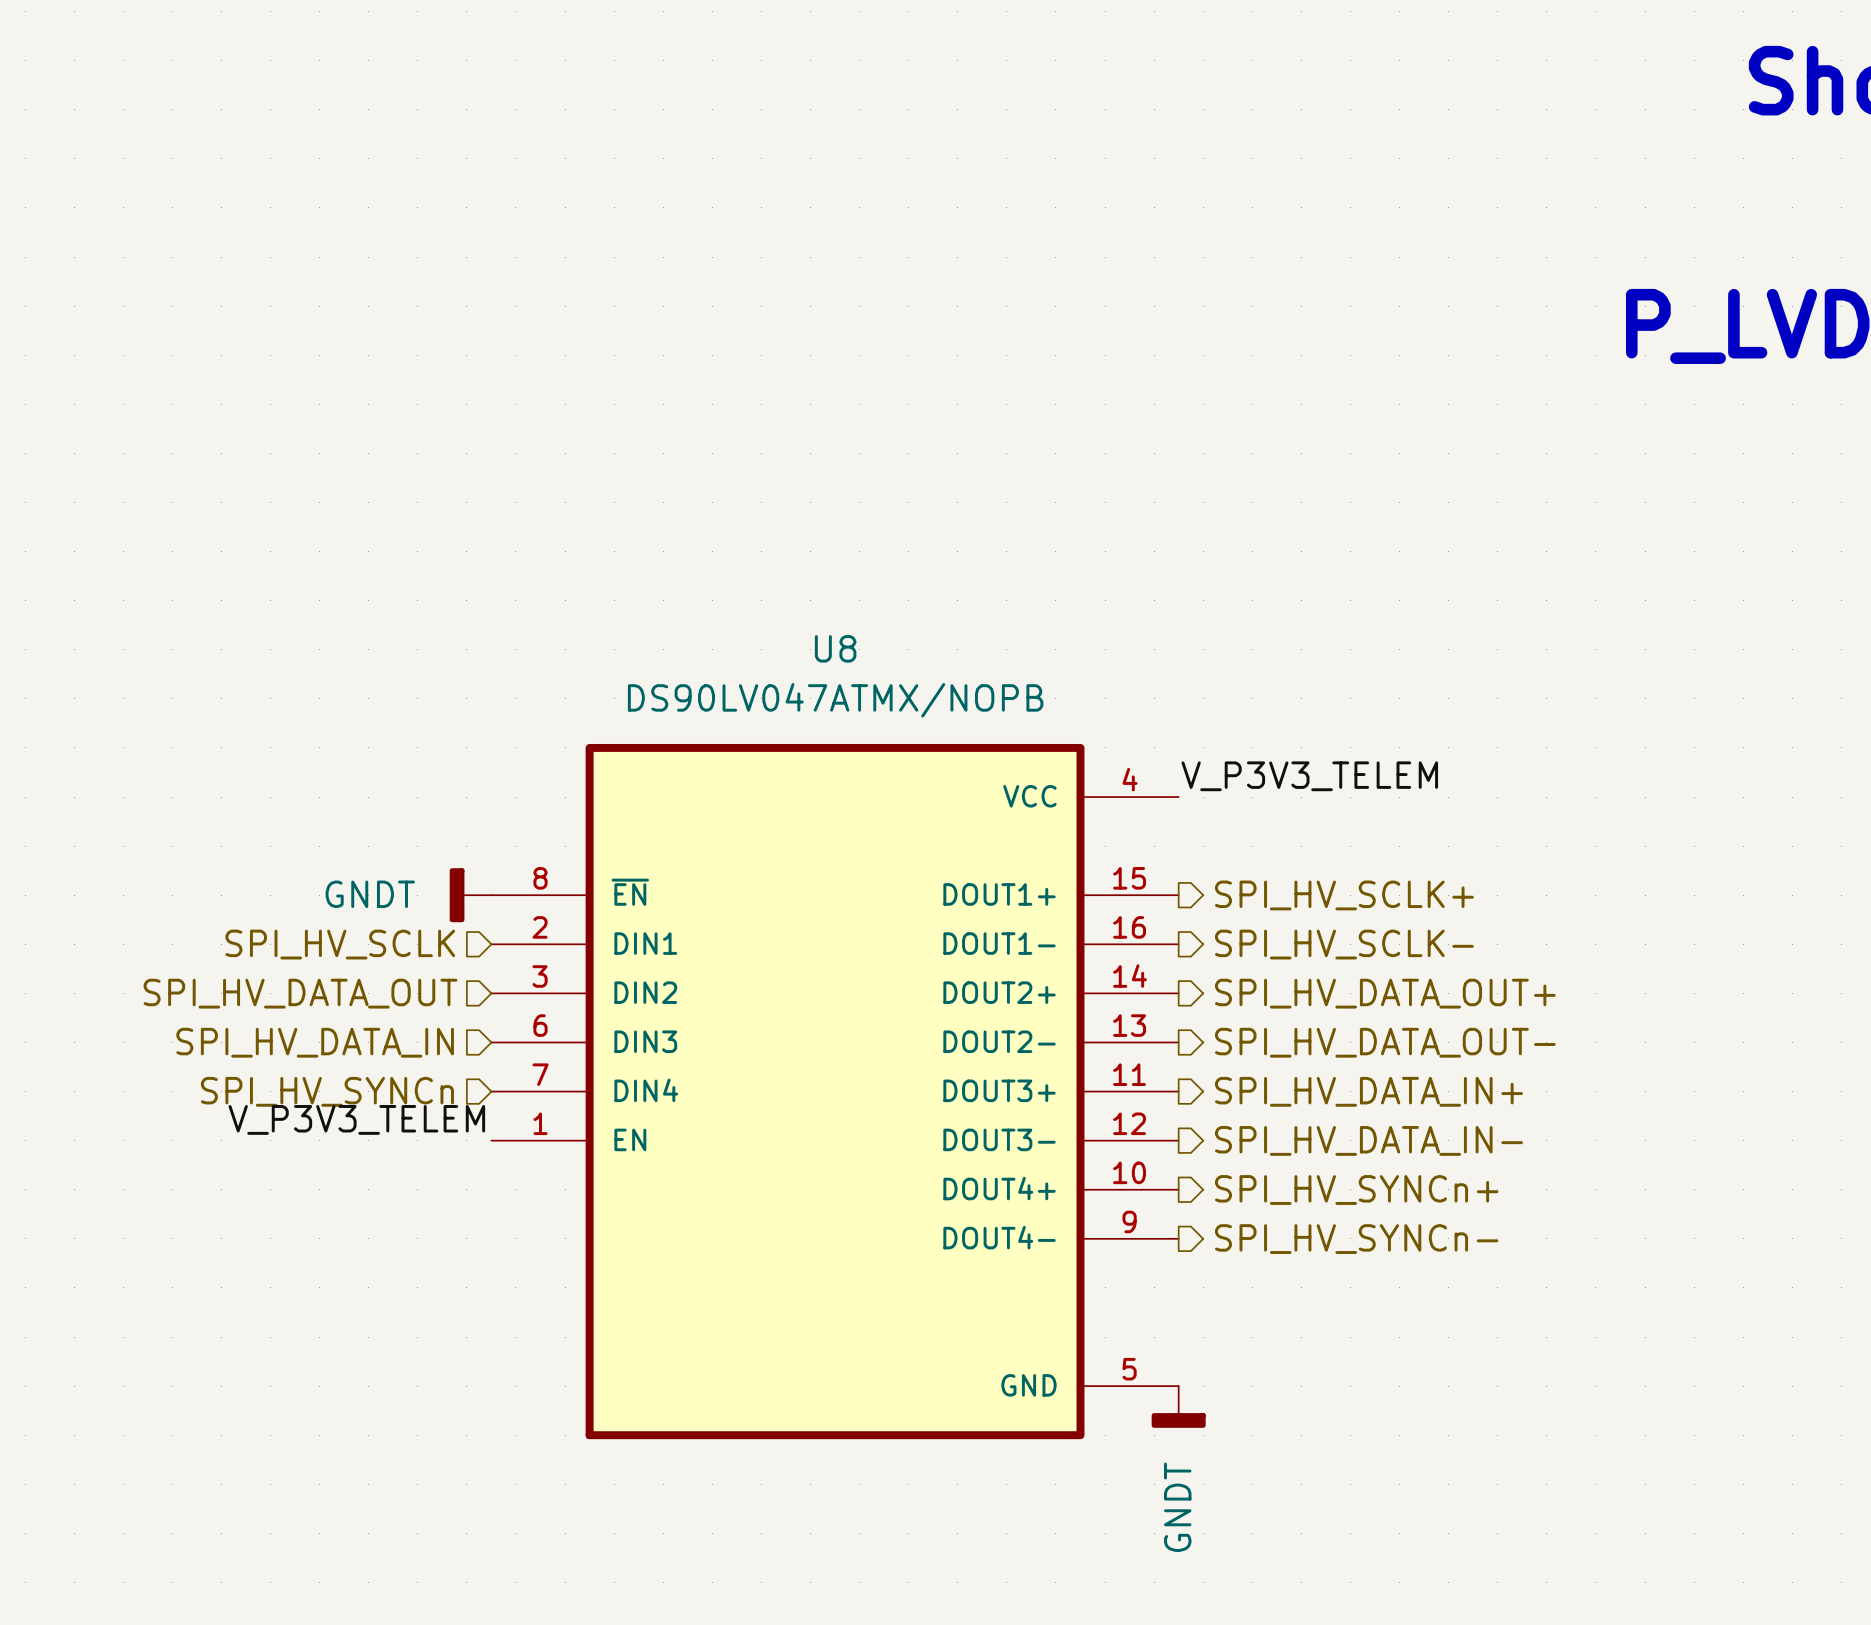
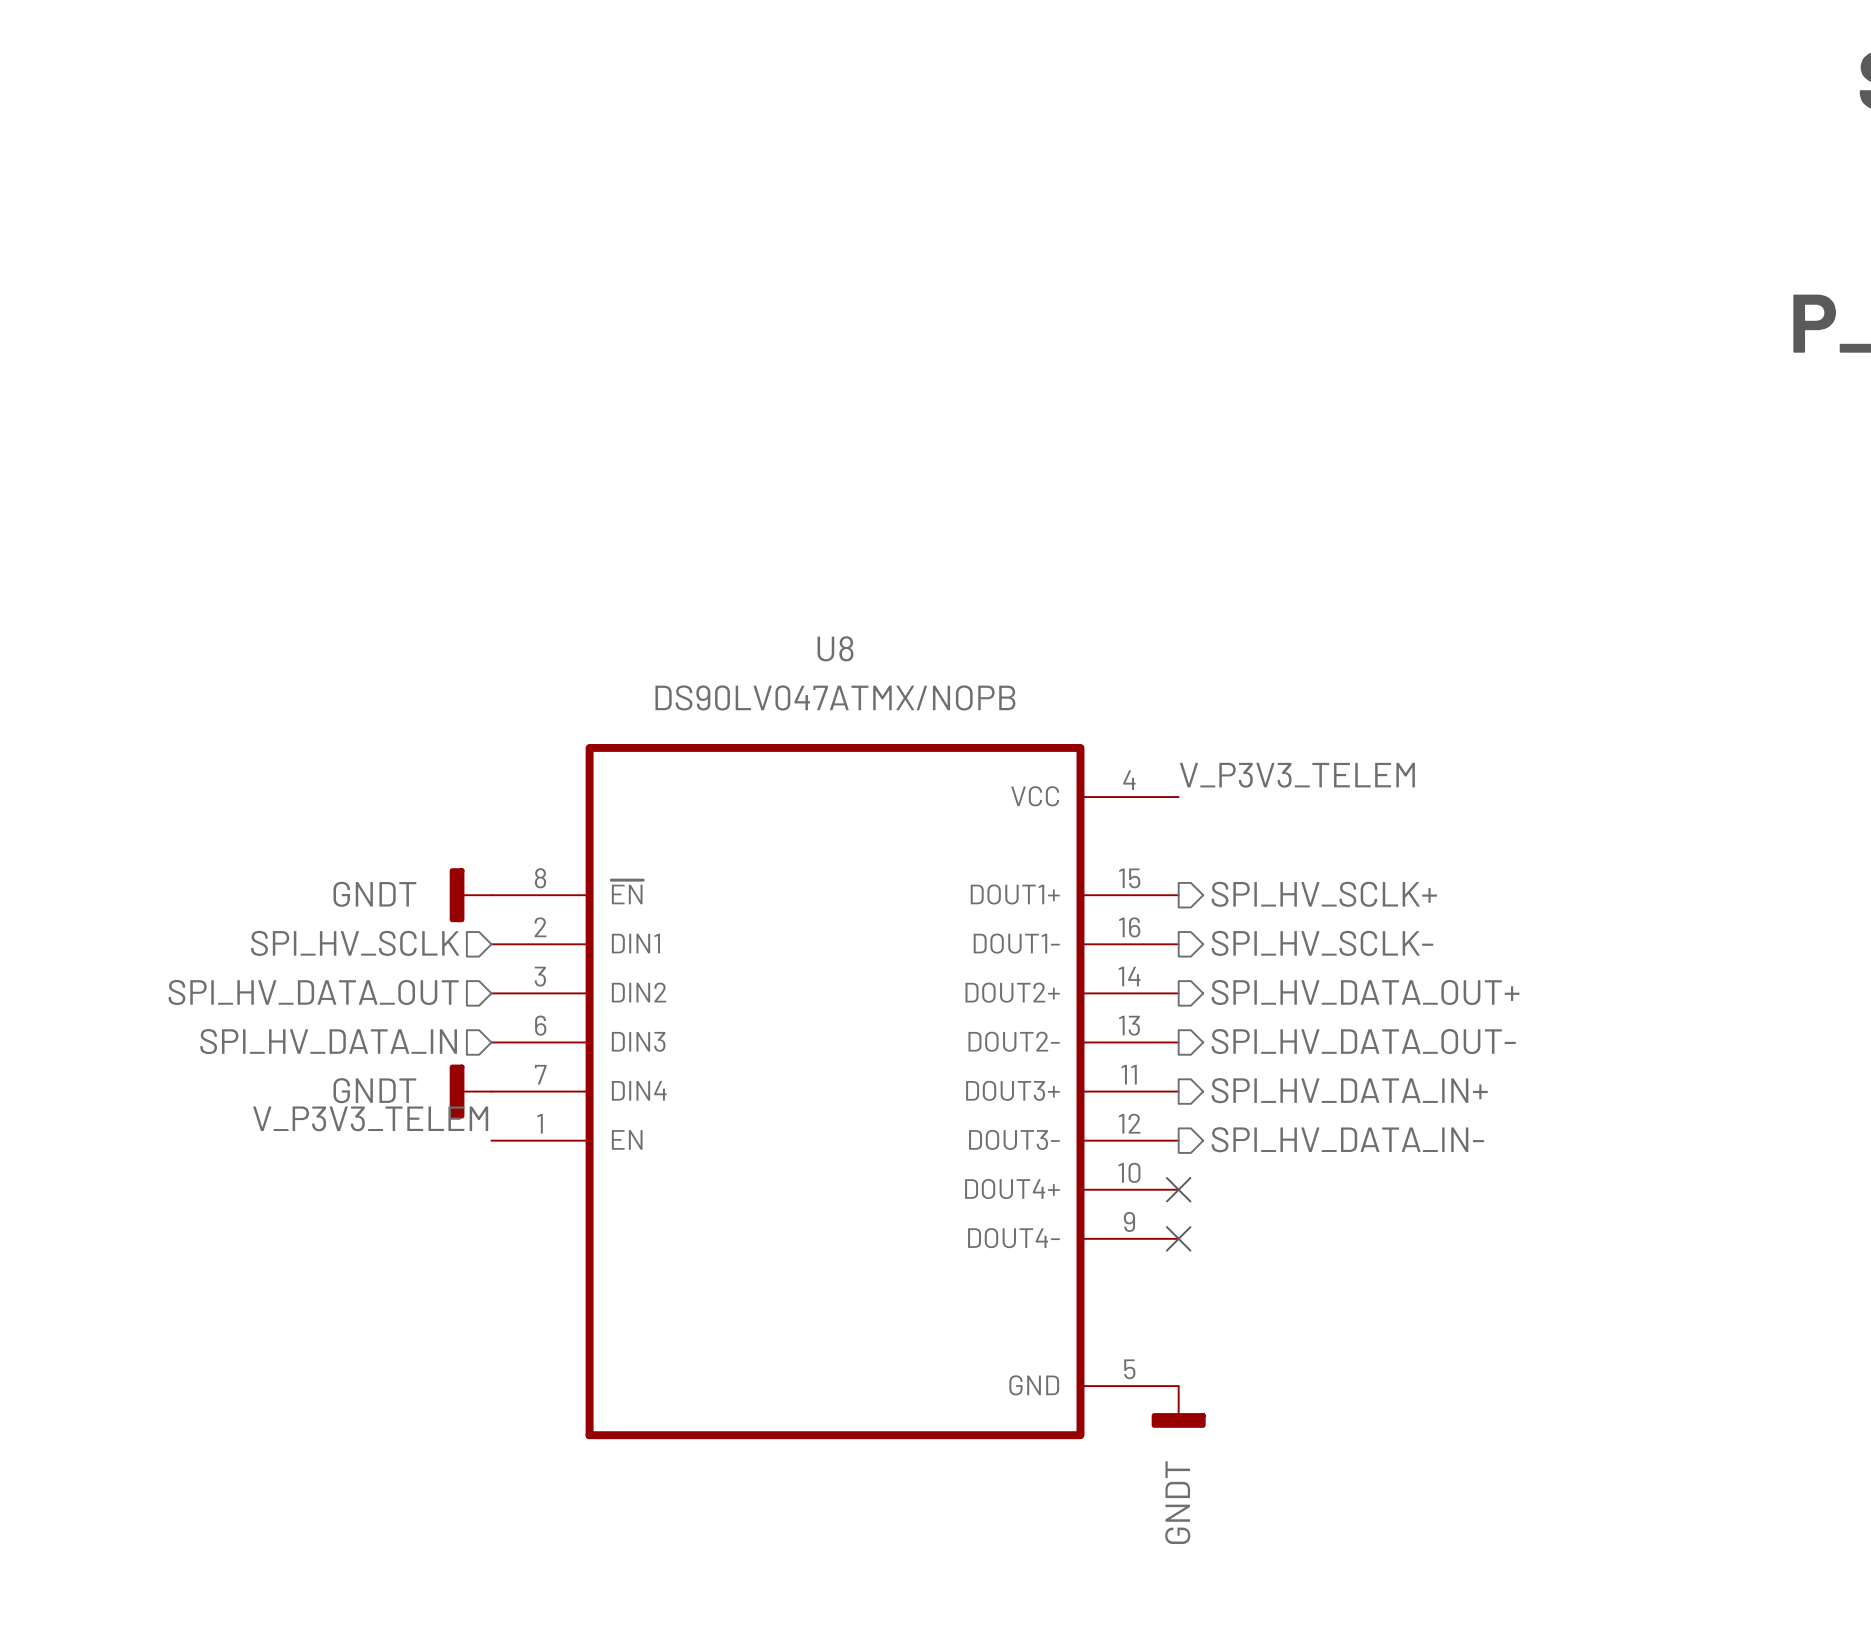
hierarchical label: SPI_HV_SYNCn (327, 1091) -> none
power symbol: none -> GNDT (470, 1091)
no-connect mark: none -> (1178, 1189)
hierarchical label: SPI_HV_SYNCn+ (1356, 1189) -> none
no-connect mark: none -> (1178, 1238)
hierarchical label: SPI_HV_SYNCn- (1356, 1239) -> none

